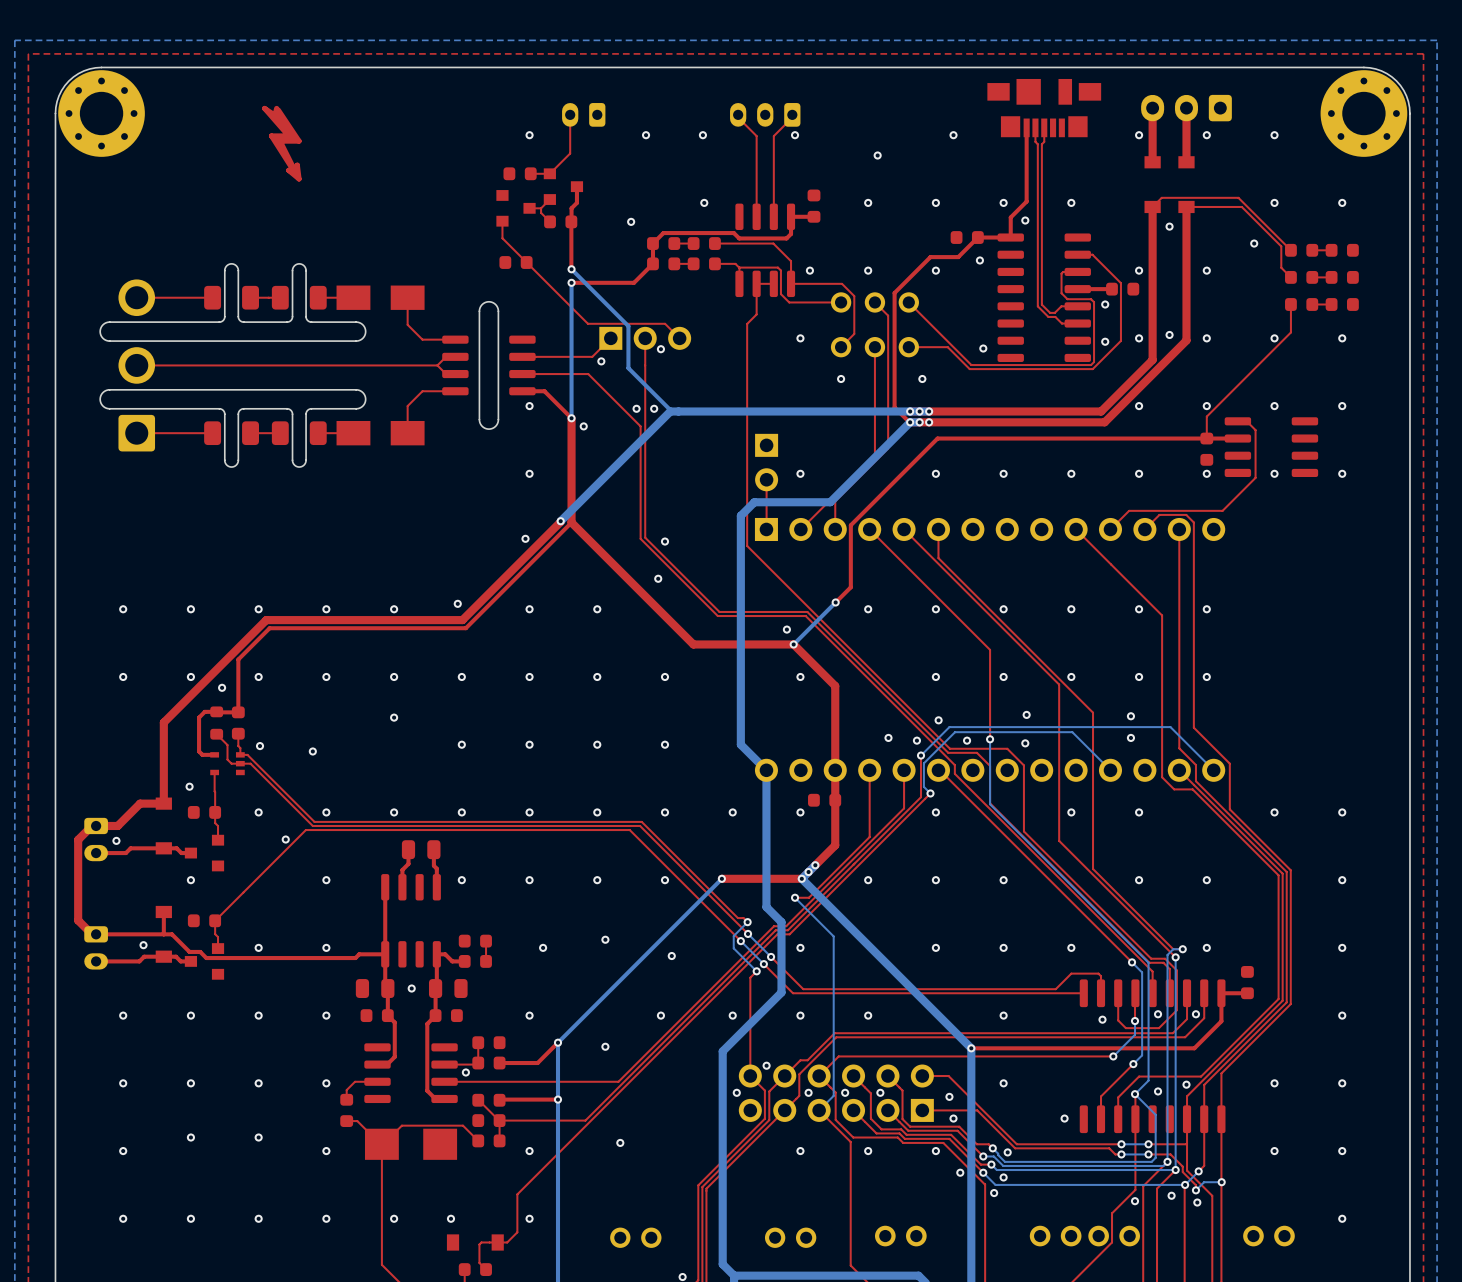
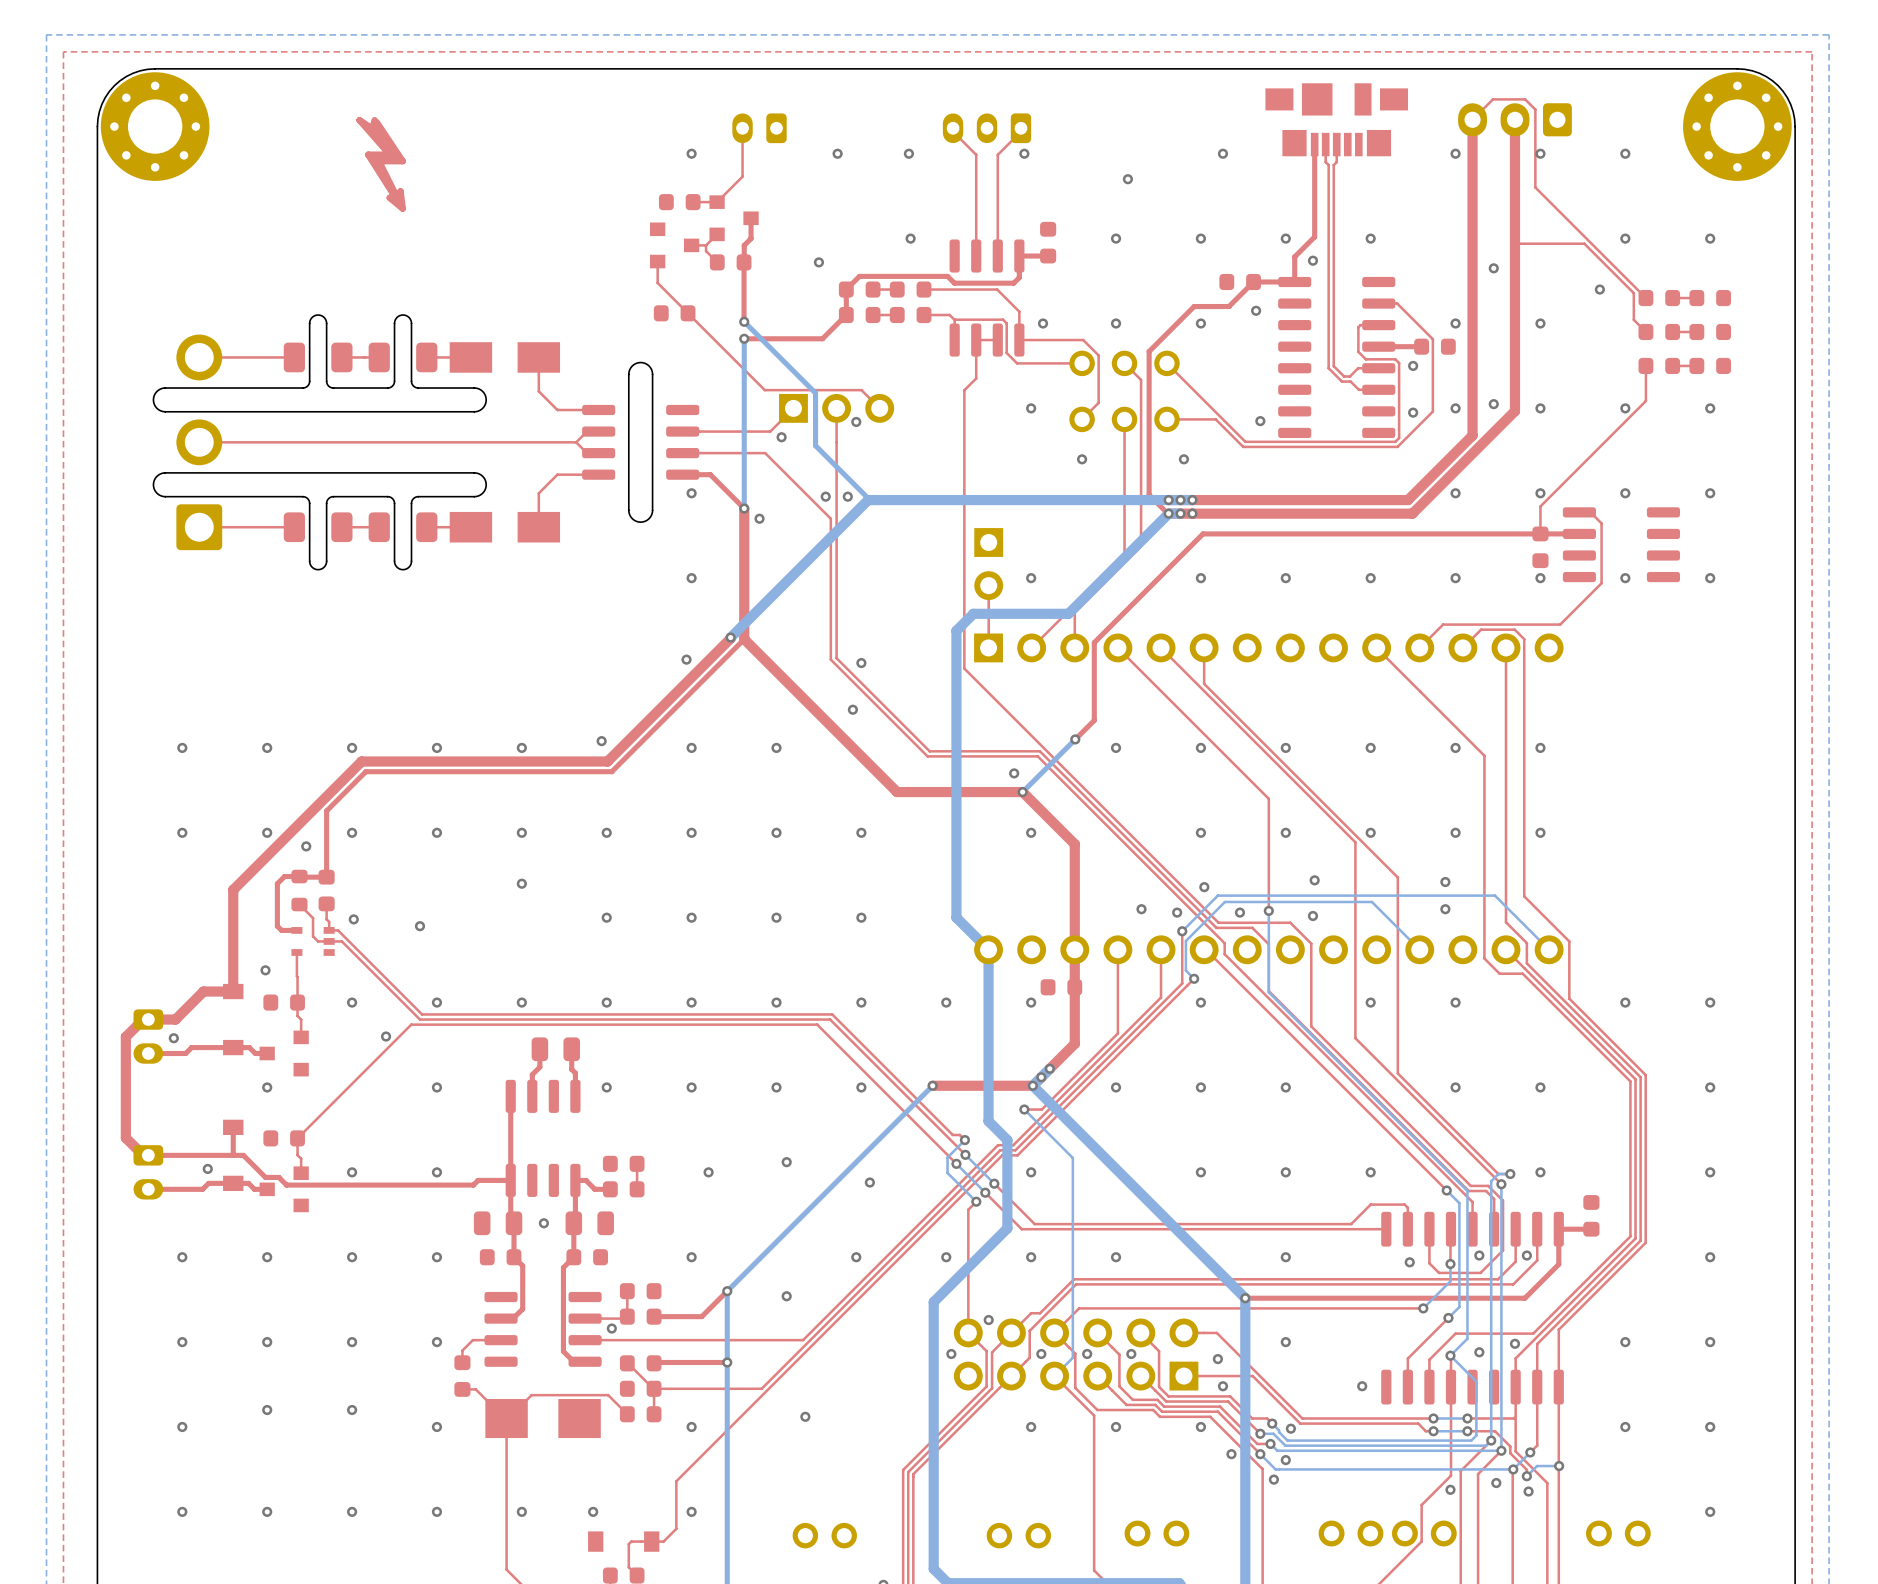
top track: none -> (1472, 119) (1492, 99) (1525, 99) (1535, 109) (1535, 187) (1580, 232)
top track: none -> (1514, 187) (1514, 243)
part: (1152, 184) -> none
part: (1186, 184) -> none
top track: (1238, 197) (1161, 197) (1152, 206) -> (1472, 187) (1472, 243)

